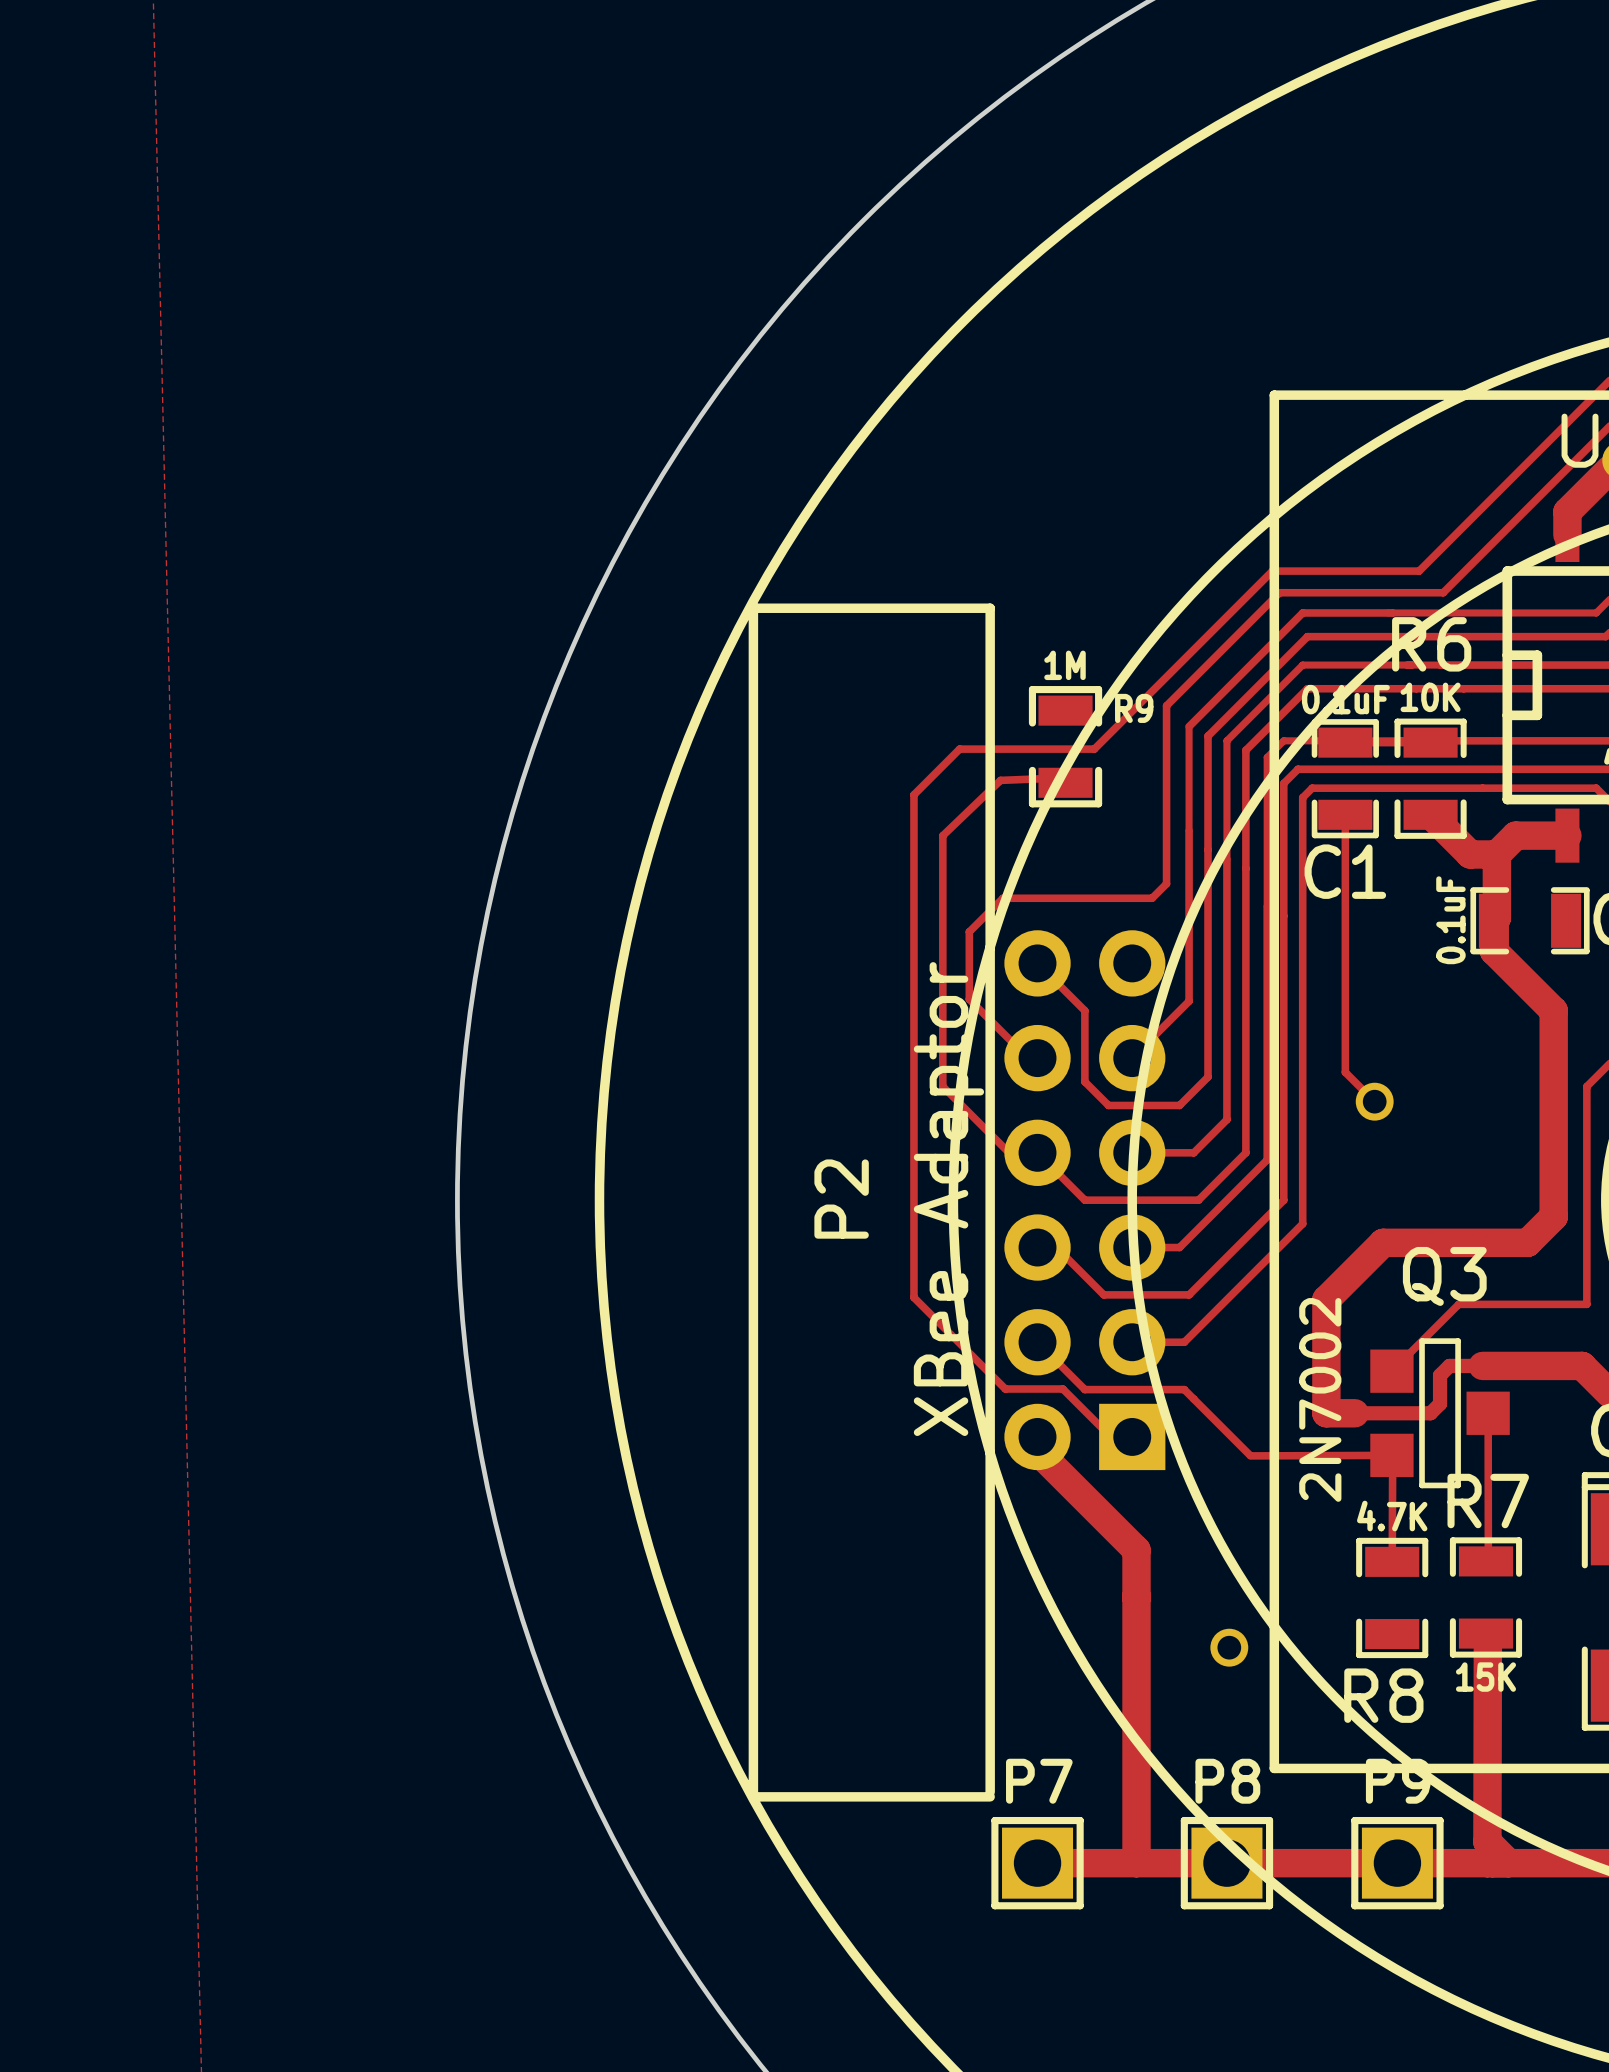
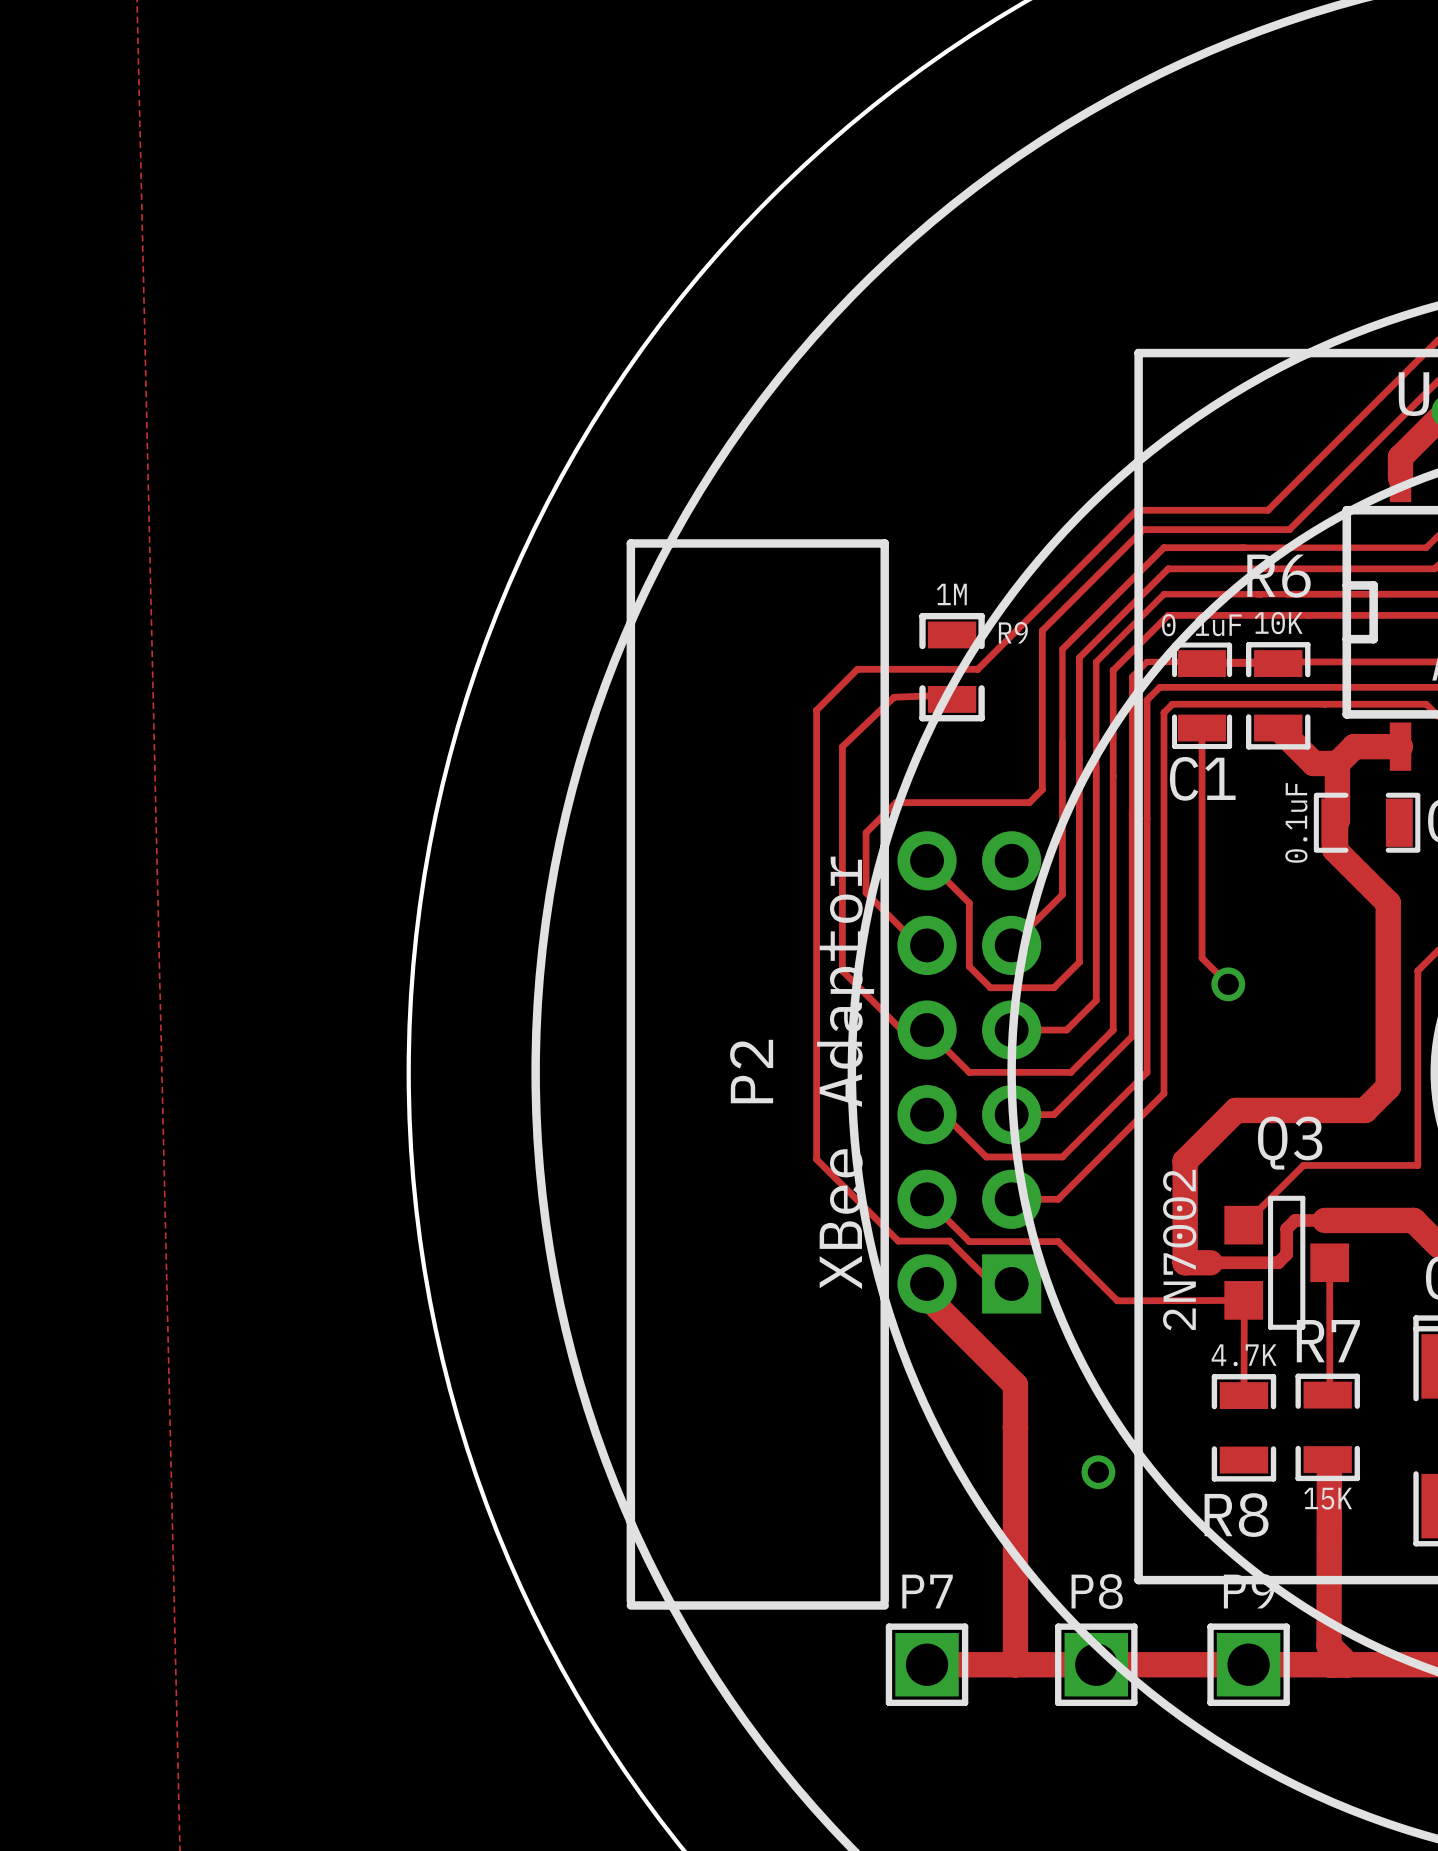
line: (753, 608) (753, 1792) -> (673, 543) (630, 543) (630, 1601)
line: none -> (630, 1605) (673, 1605)

